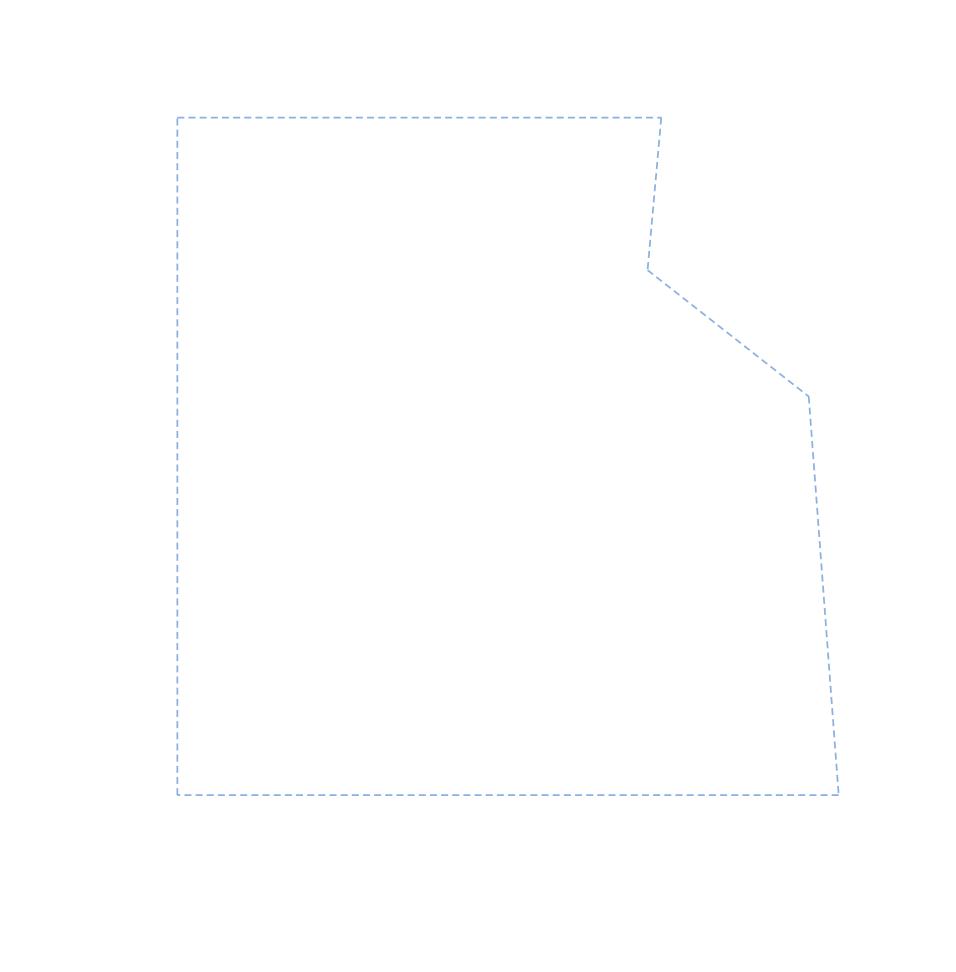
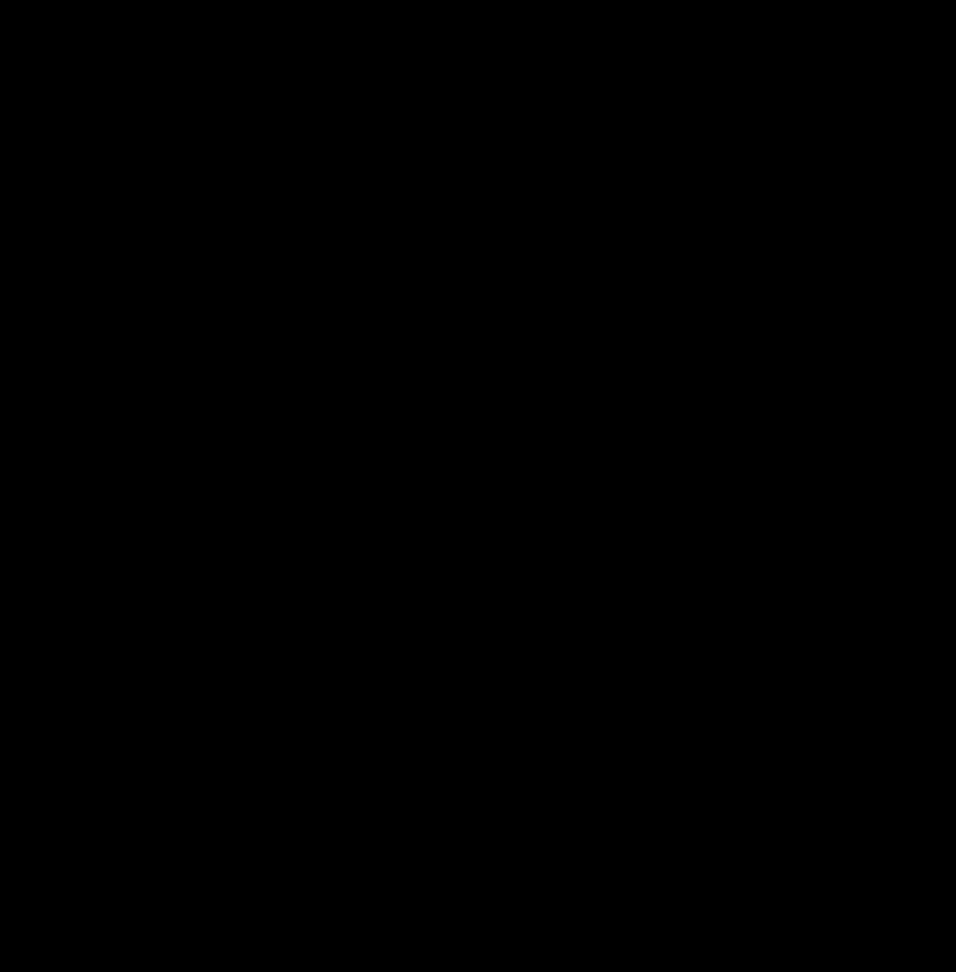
bottom zone outline: (177, 117) (661, 117) (647, 270) (808, 396) (838, 795) (177, 795) (177, 117) -> none

